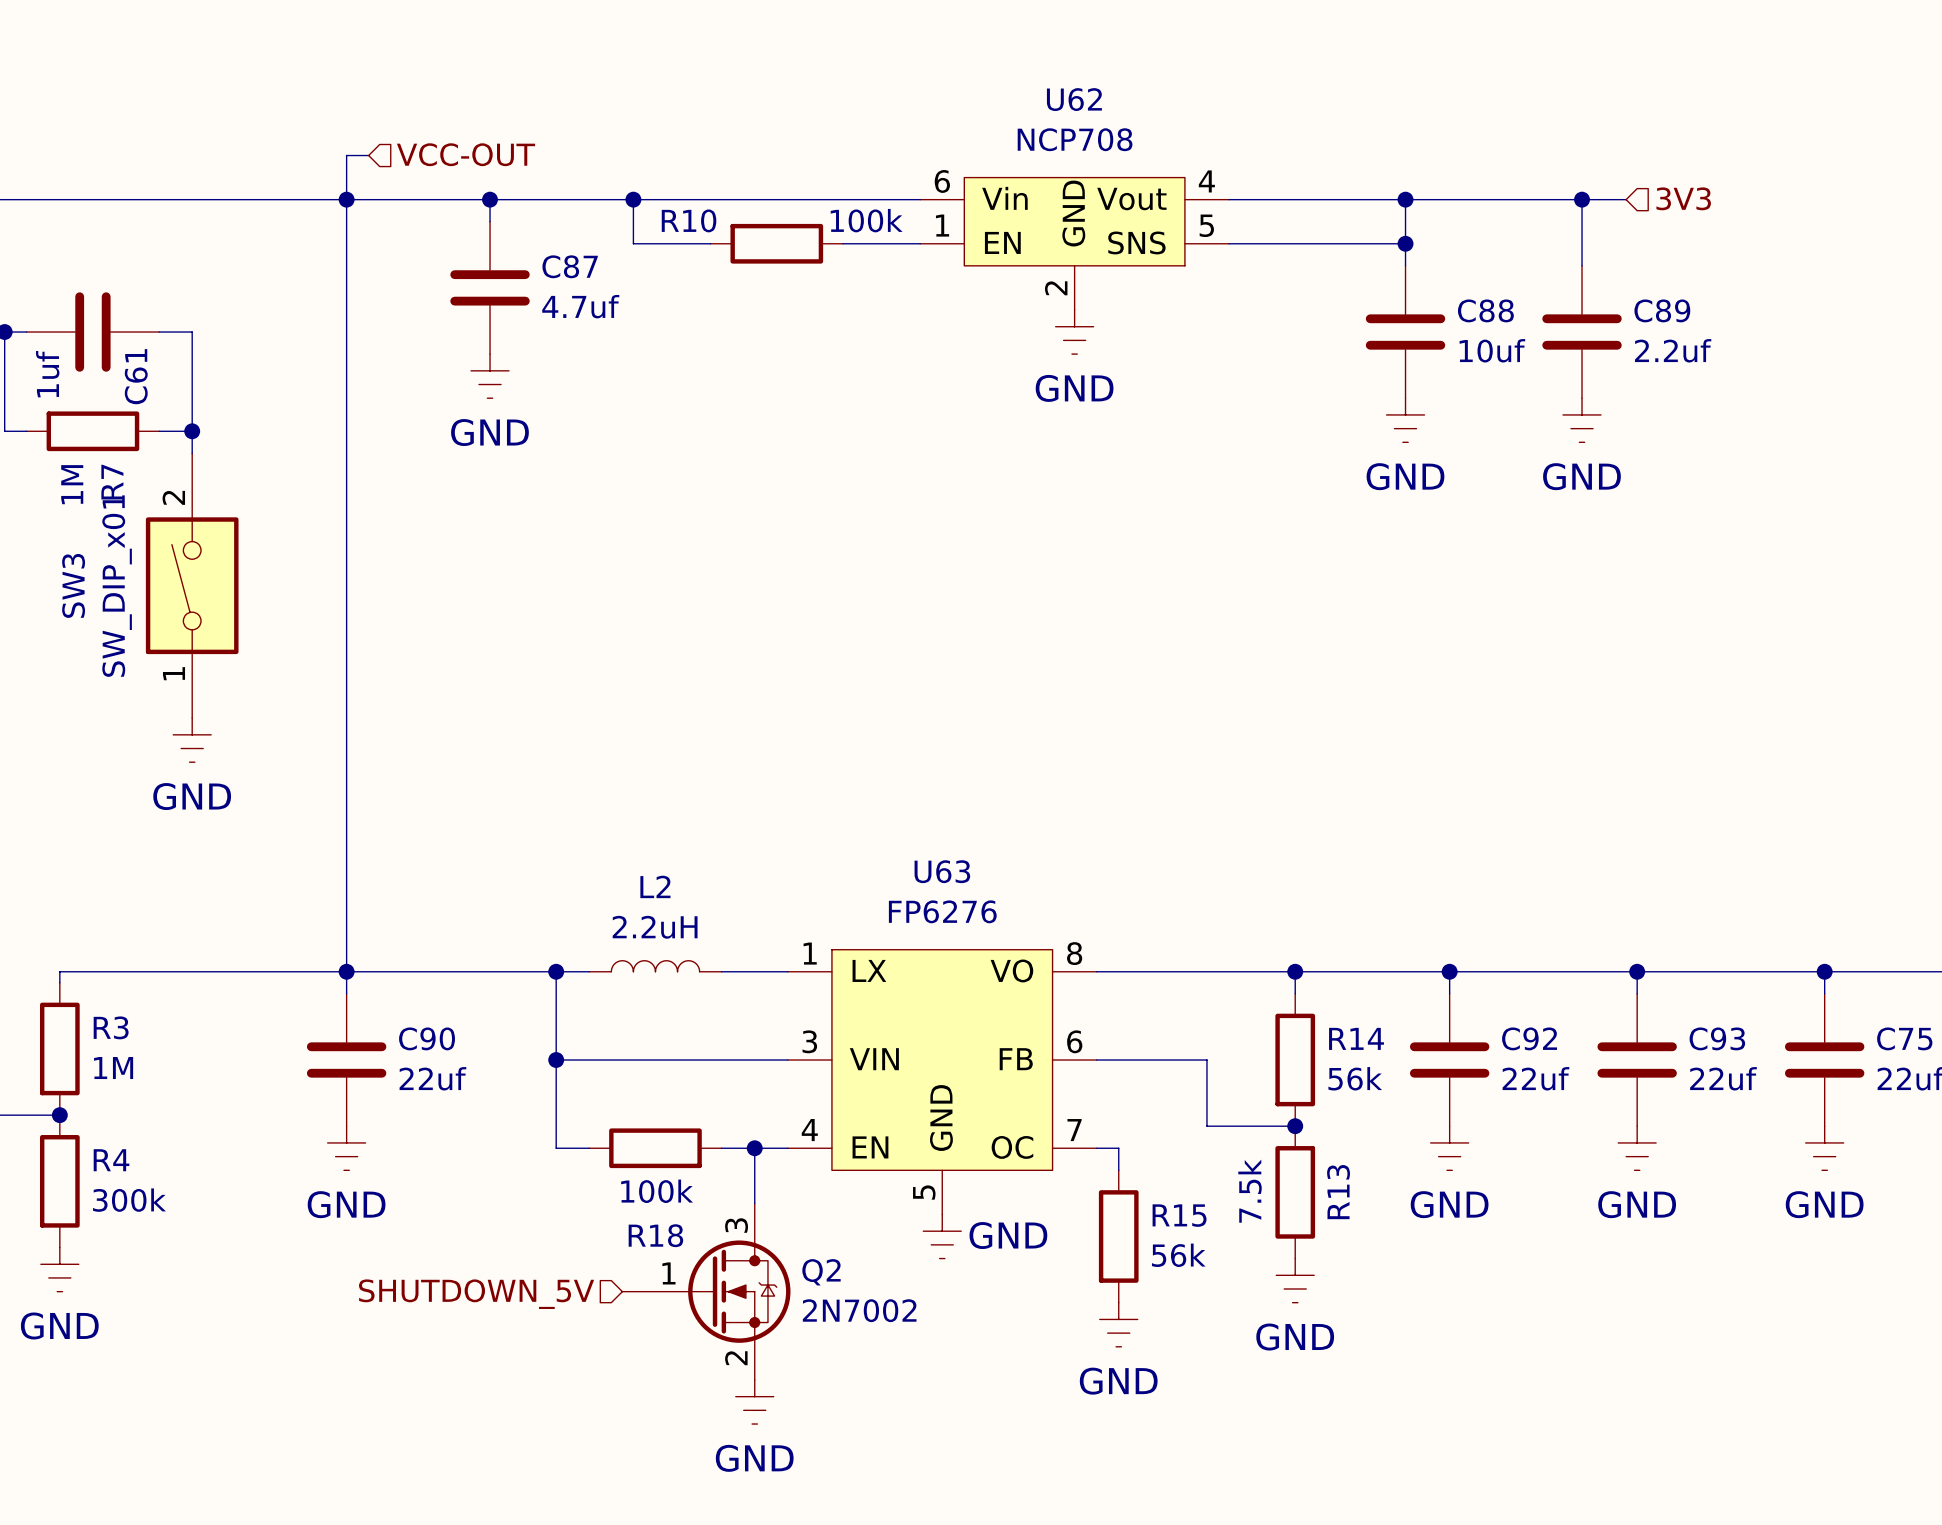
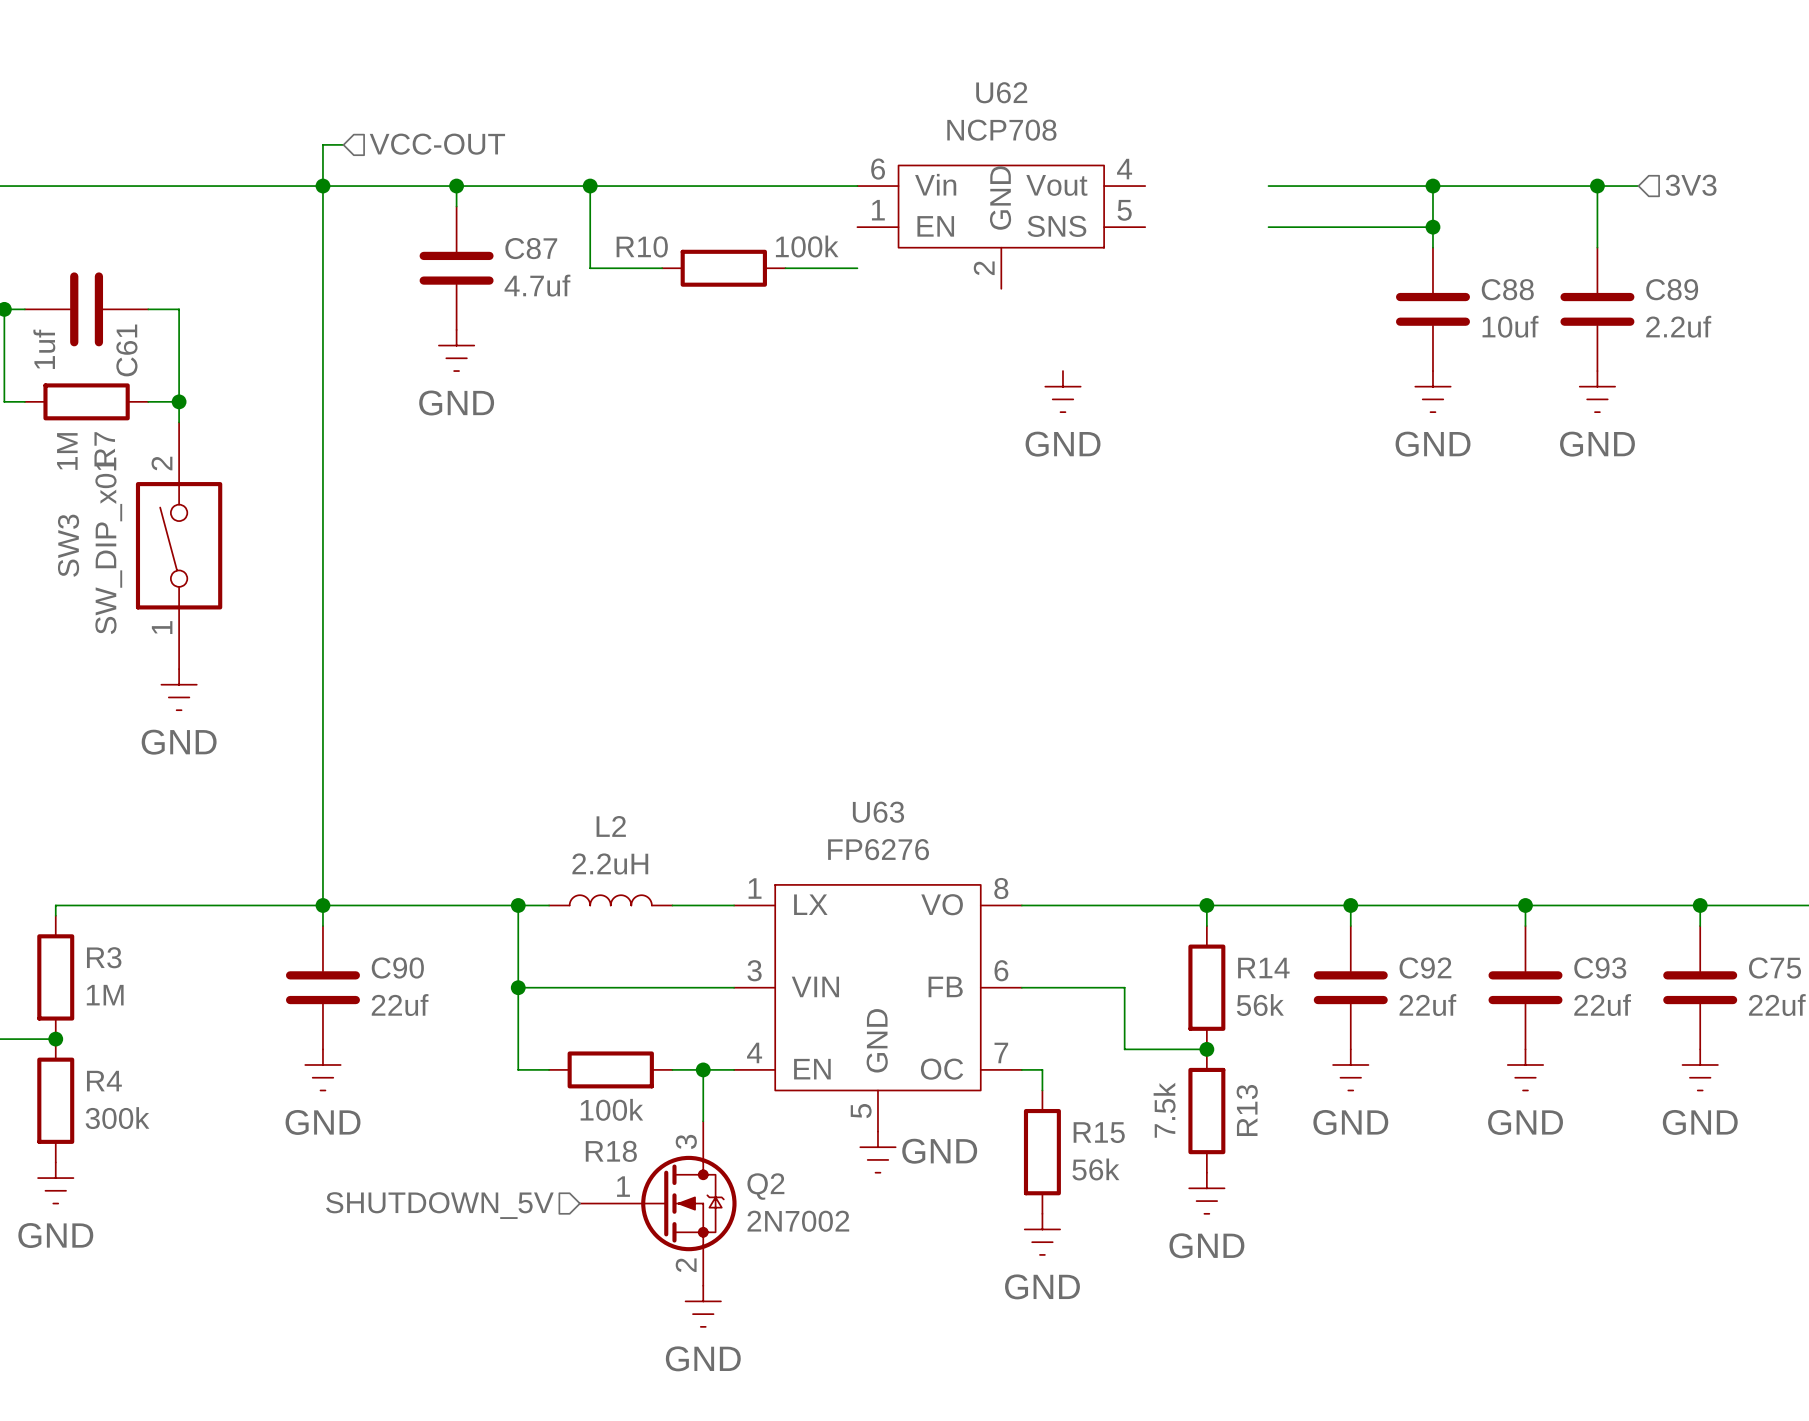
hierarchical label position: 3V3 (1683, 198) -> 3V3 (1691, 185)
wire: (1229, 199) (1361, 199) -> (1515, 186) (1638, 186)
wire: (1405, 199) (1405, 265) -> (1432, 186) (1432, 247)
junction: (1405, 199) -> none
junction: none -> (1432, 186)
wire: (1582, 199) (1582, 265) -> (1597, 186) (1597, 247)
junction: (1582, 199) -> none
junction: none -> (1597, 186)
wire: (633, 243) (710, 243) -> (590, 227) (590, 268) (662, 268)
R10 position: (776, 243) -> (723, 268)
wire: (842, 243) (920, 243) -> (785, 268) (857, 268)
wire: (1229, 243) (1361, 243) -> (1309, 227) (1432, 227)
junction: (1405, 243) -> none
junction: none -> (1432, 227)
power symbol position: GND (1074, 332) -> GND (1062, 391)
C88 position: (1405, 332) -> (1432, 309)
C89 position: (1582, 332) -> (1597, 309)
power symbol: GND (1405, 420) -> none
power symbol position: GND (1582, 420) -> GND (1432, 391)
power symbol: none -> GND (1597, 391)

